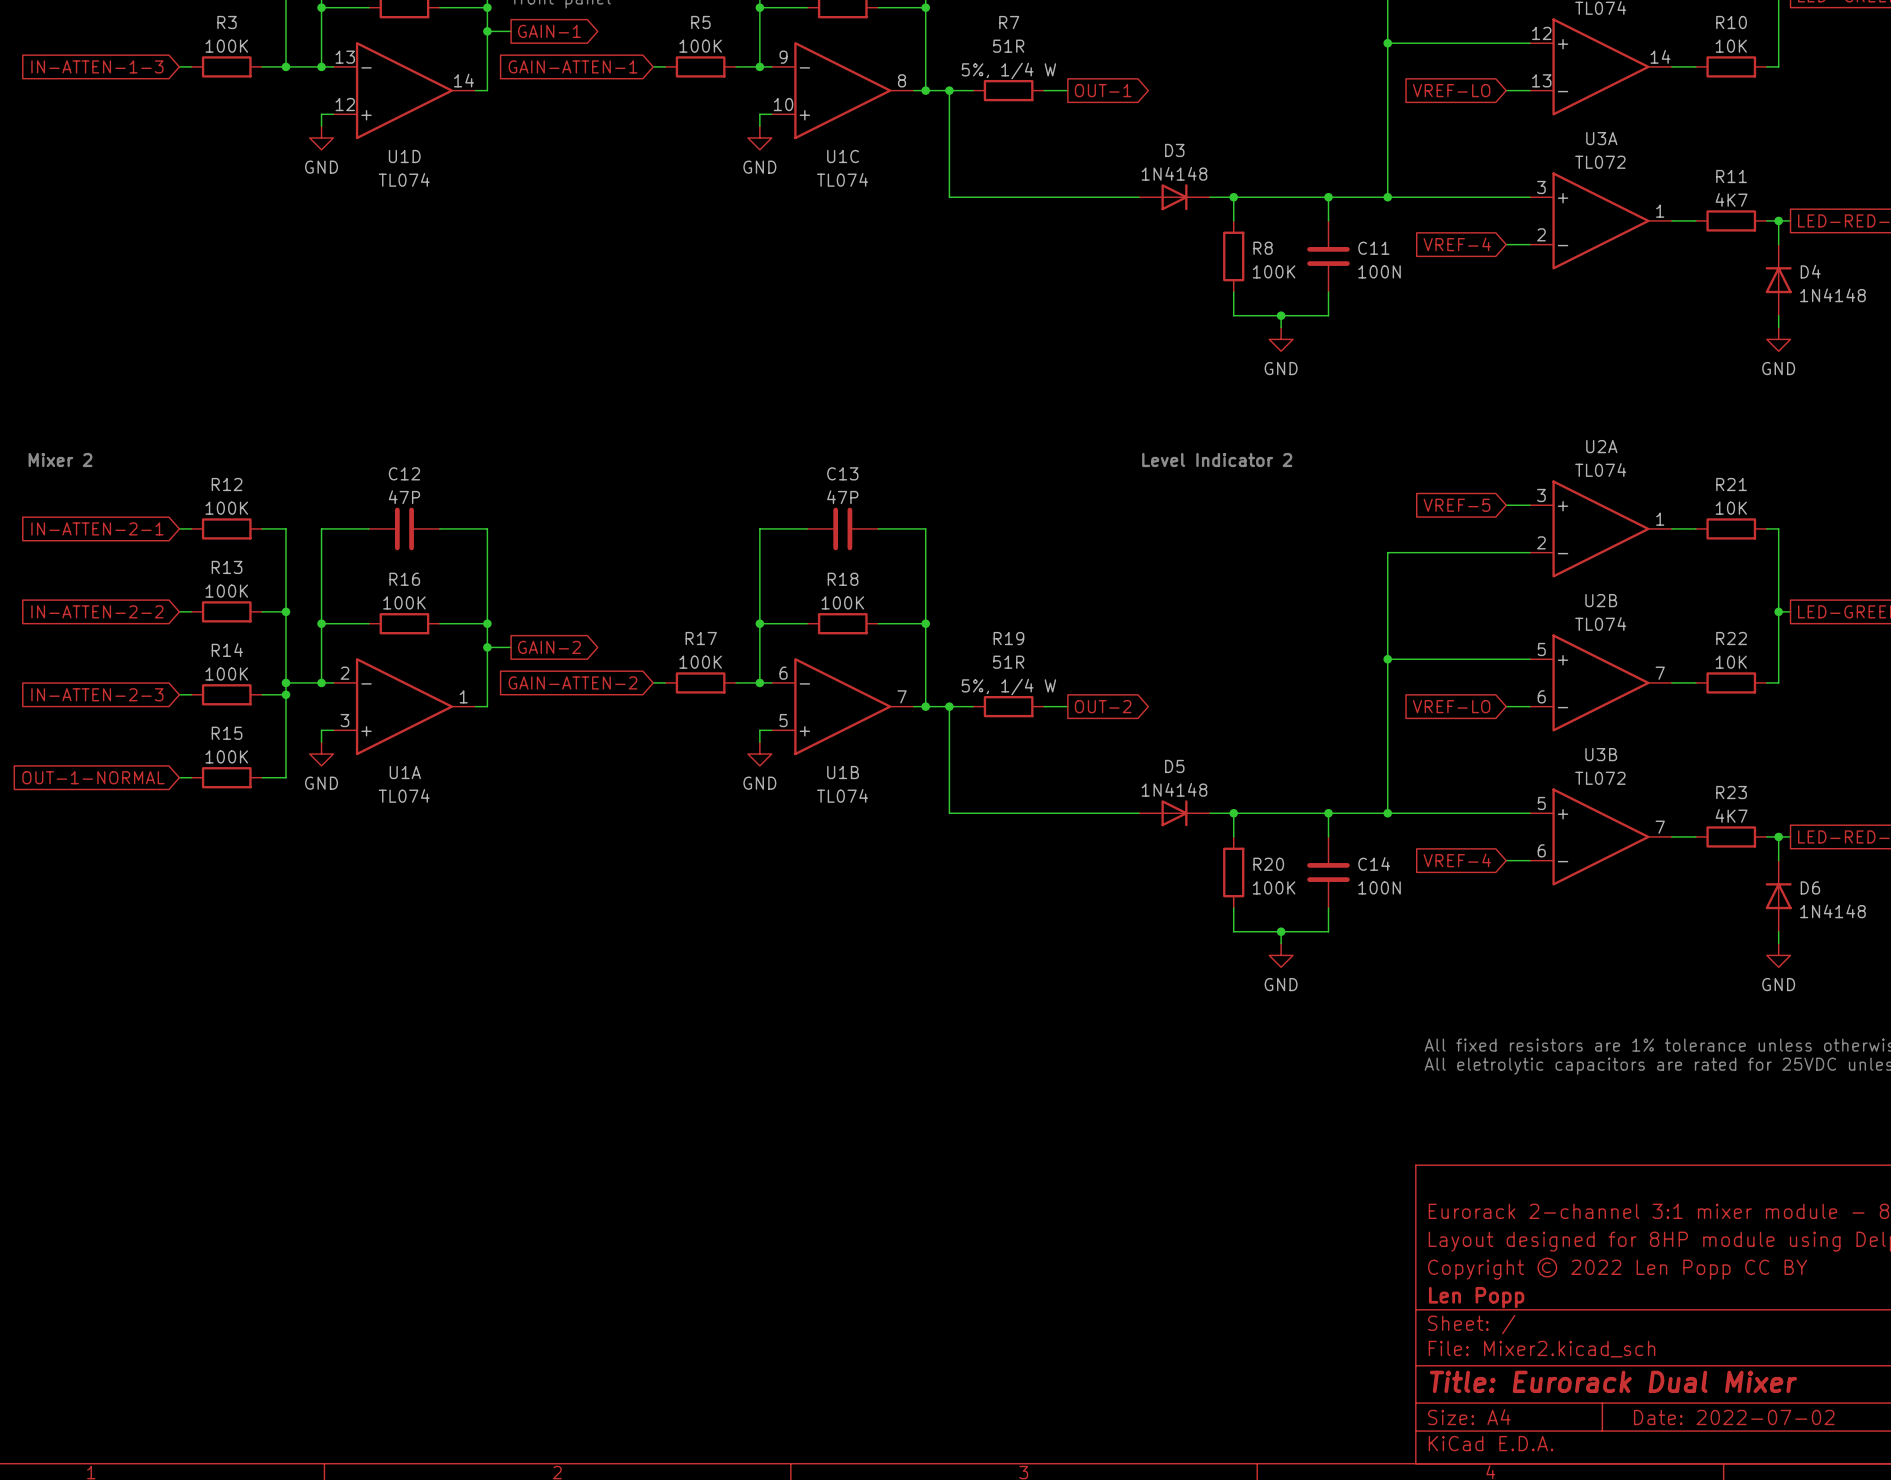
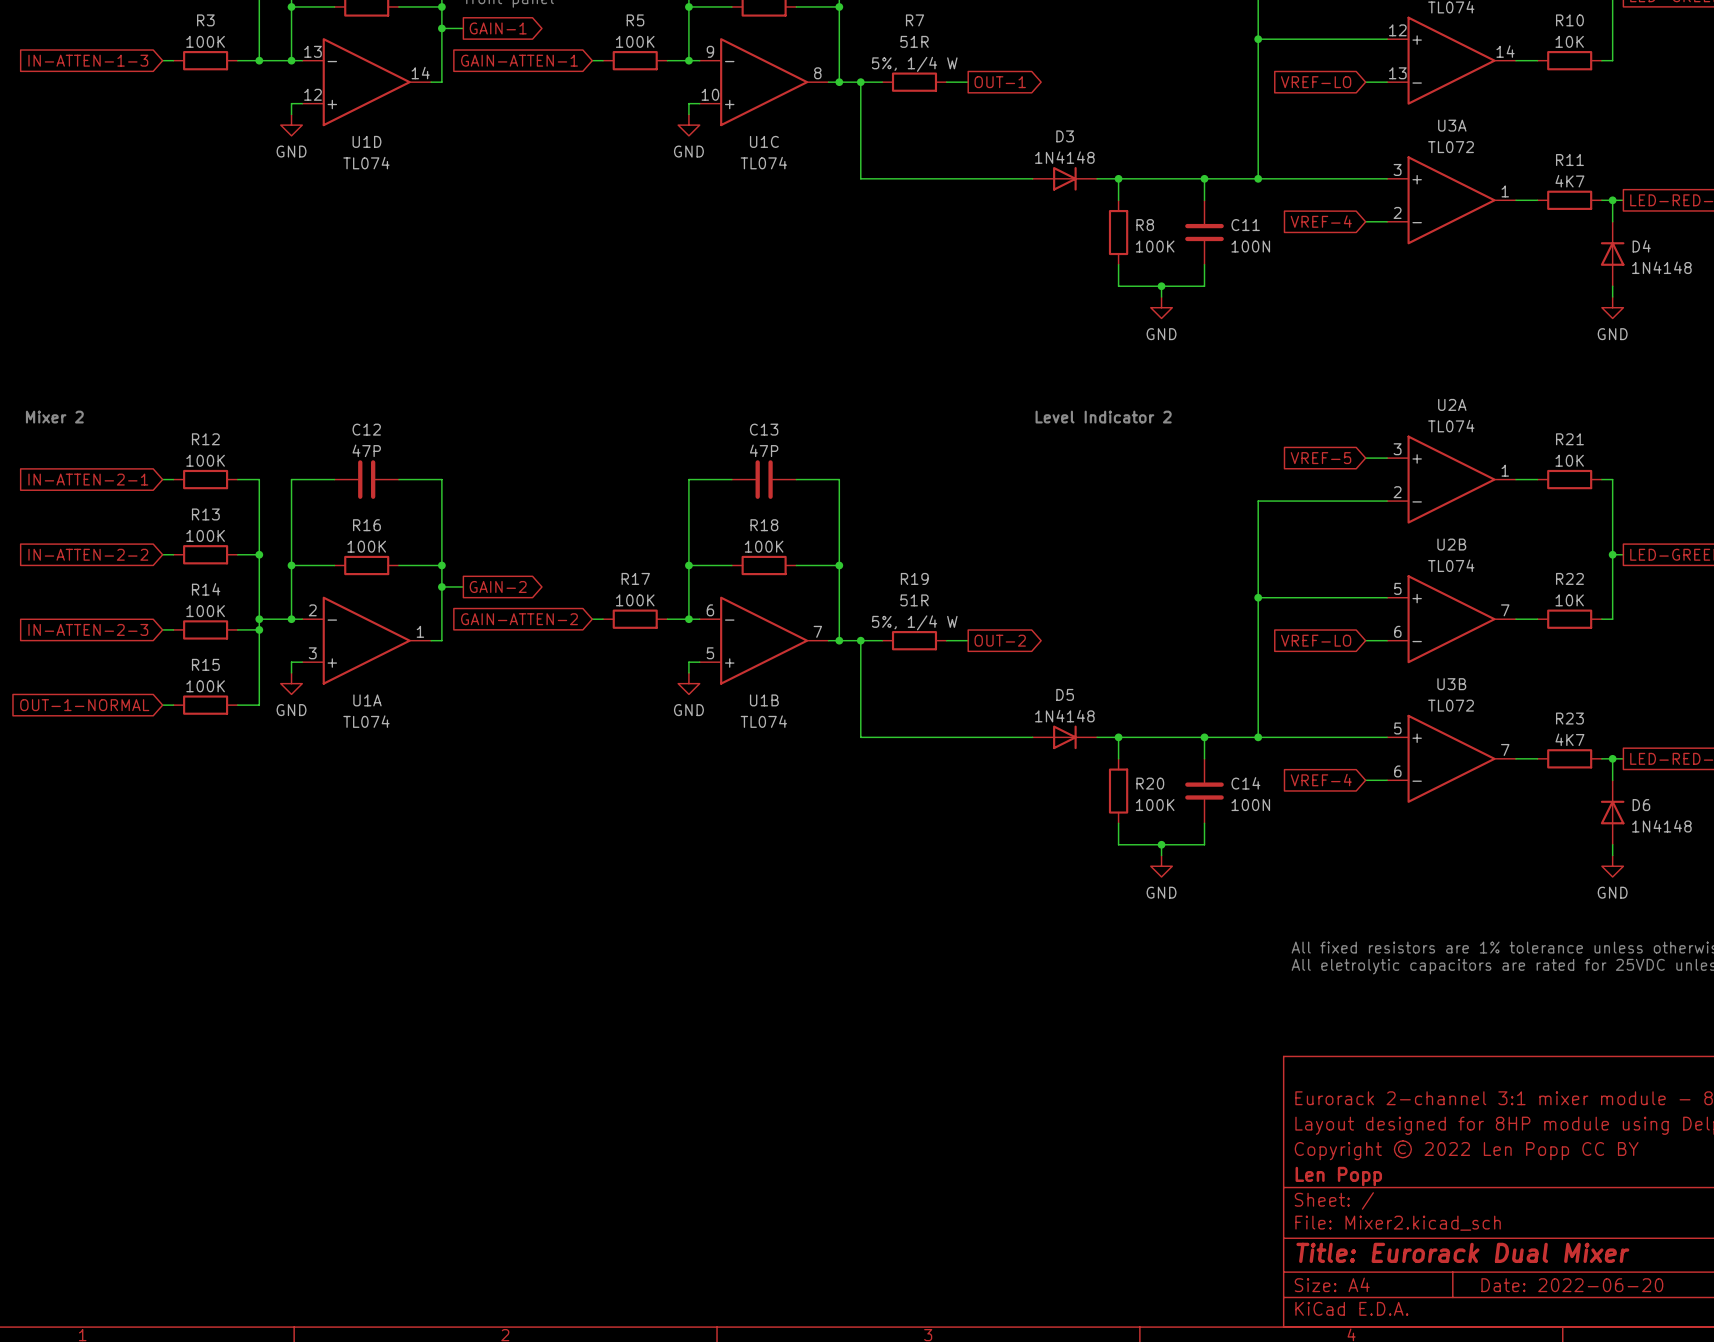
title block: Date: 2022-07-02 (1734, 1417) -> Date: 2022-06-20 (1572, 1285)

